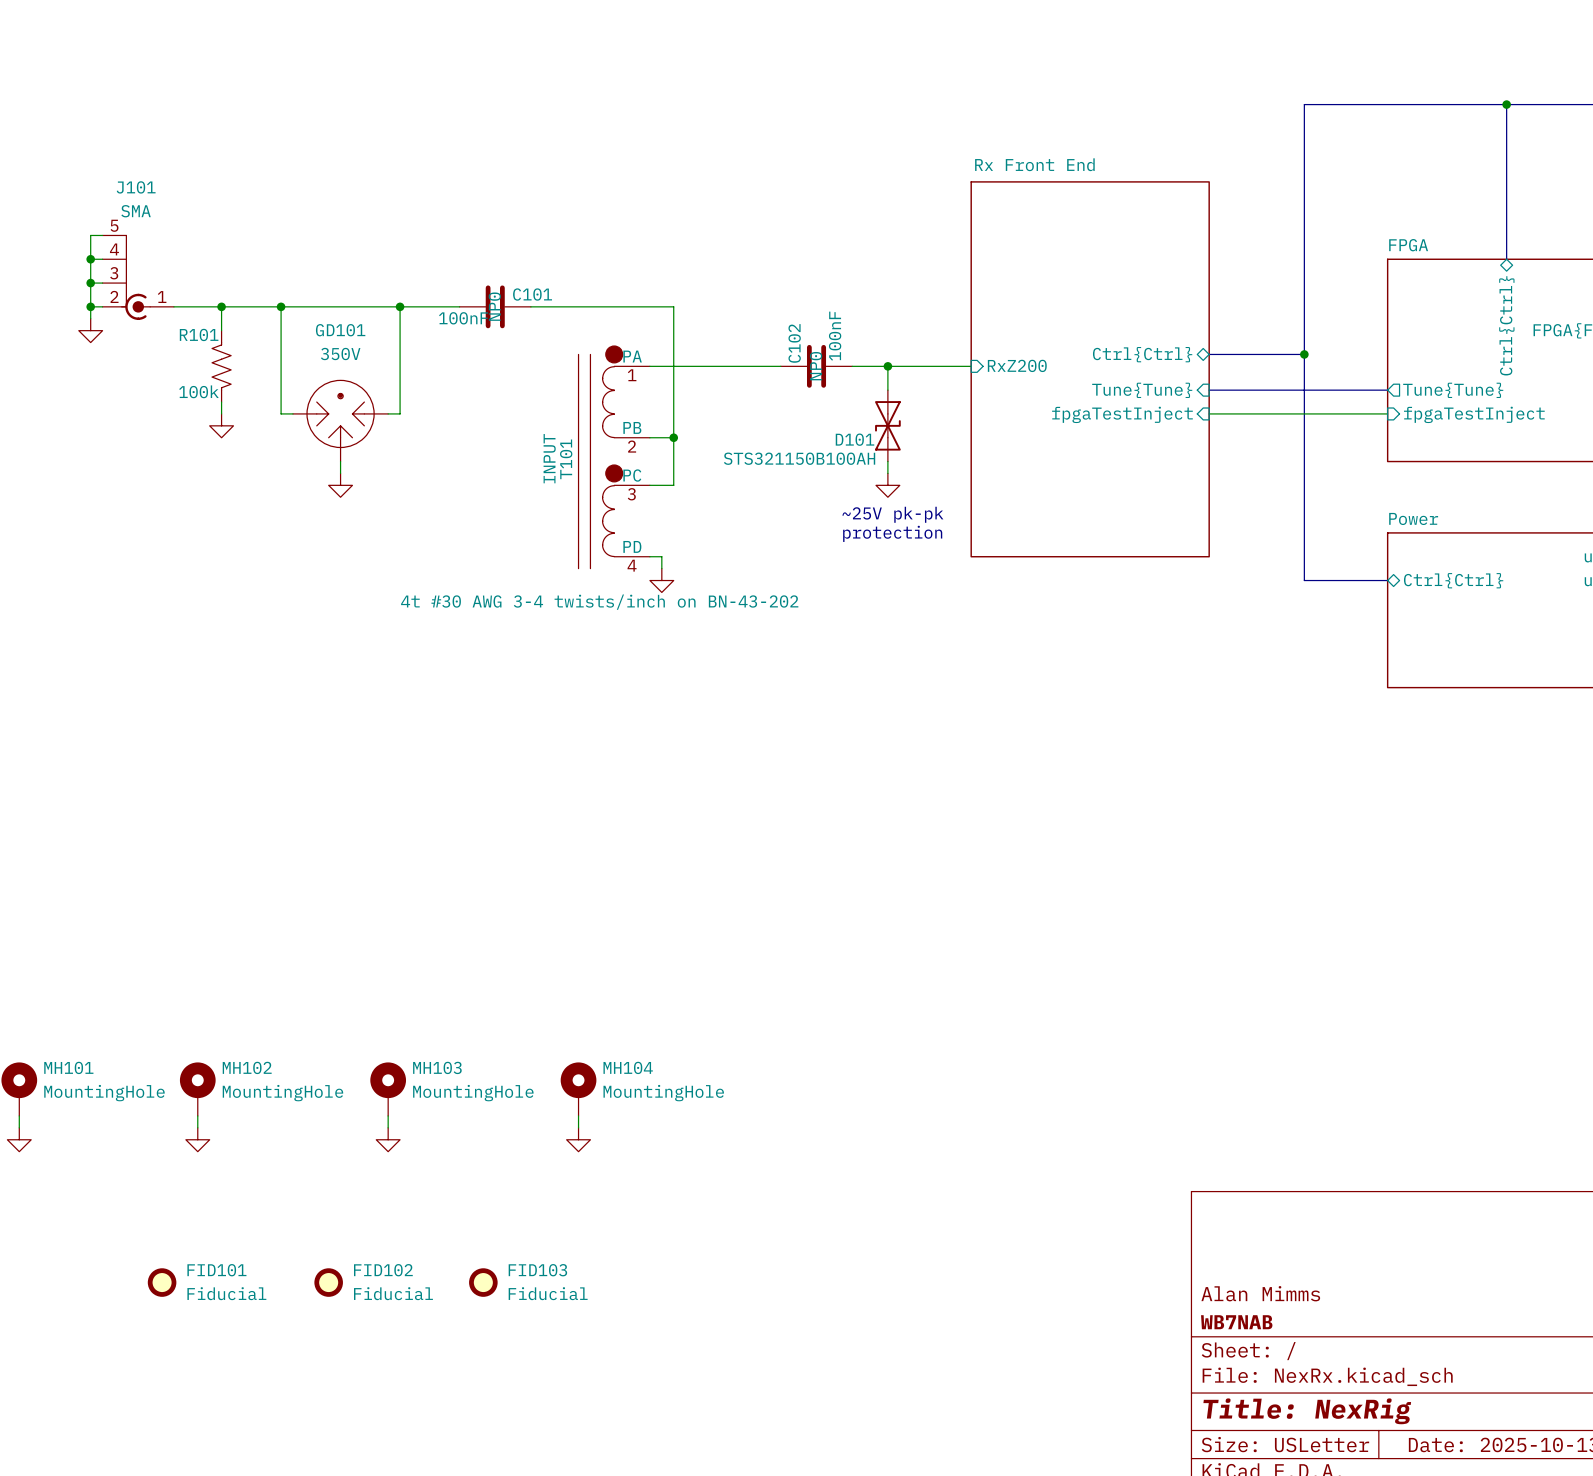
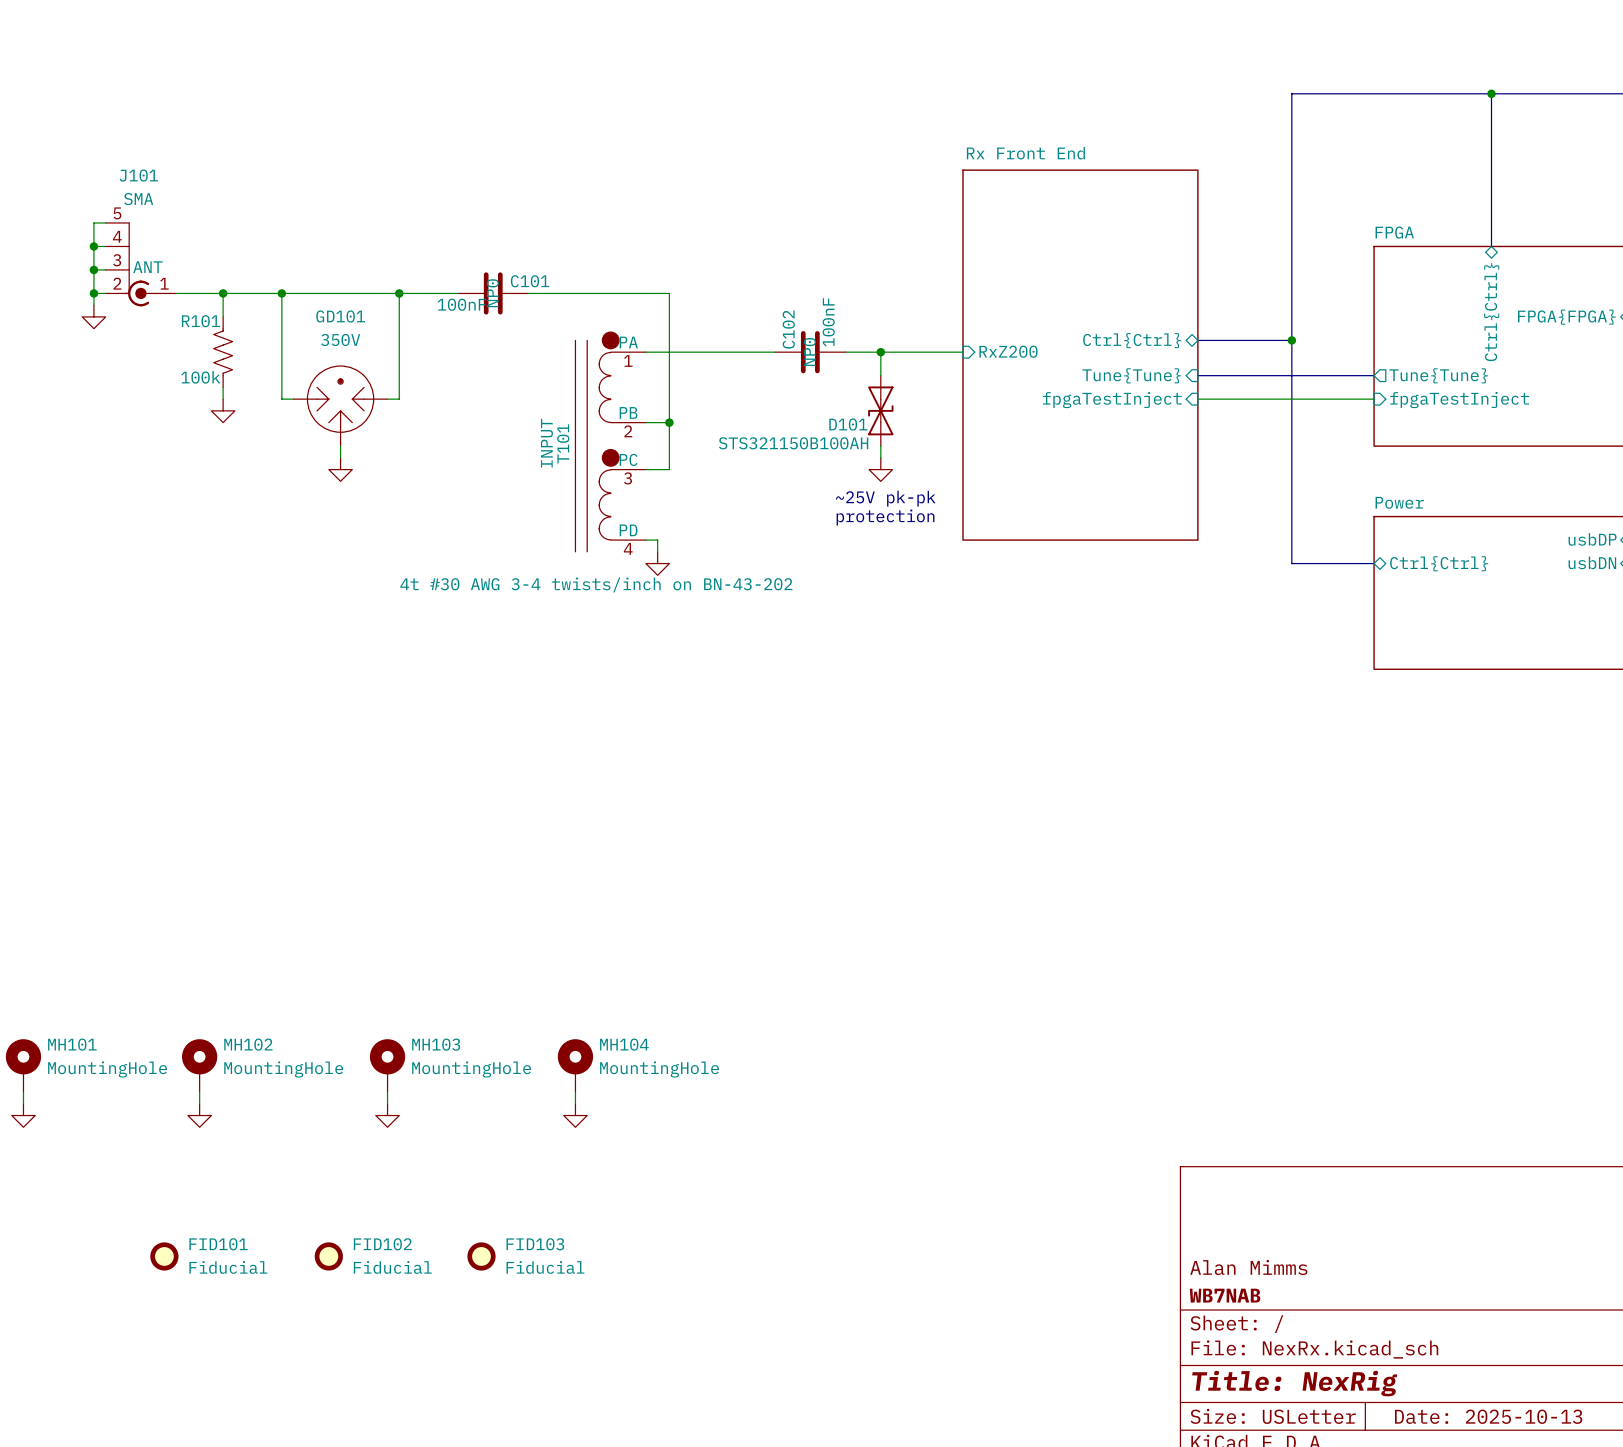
J101 text: none -> ANT (148, 267)

